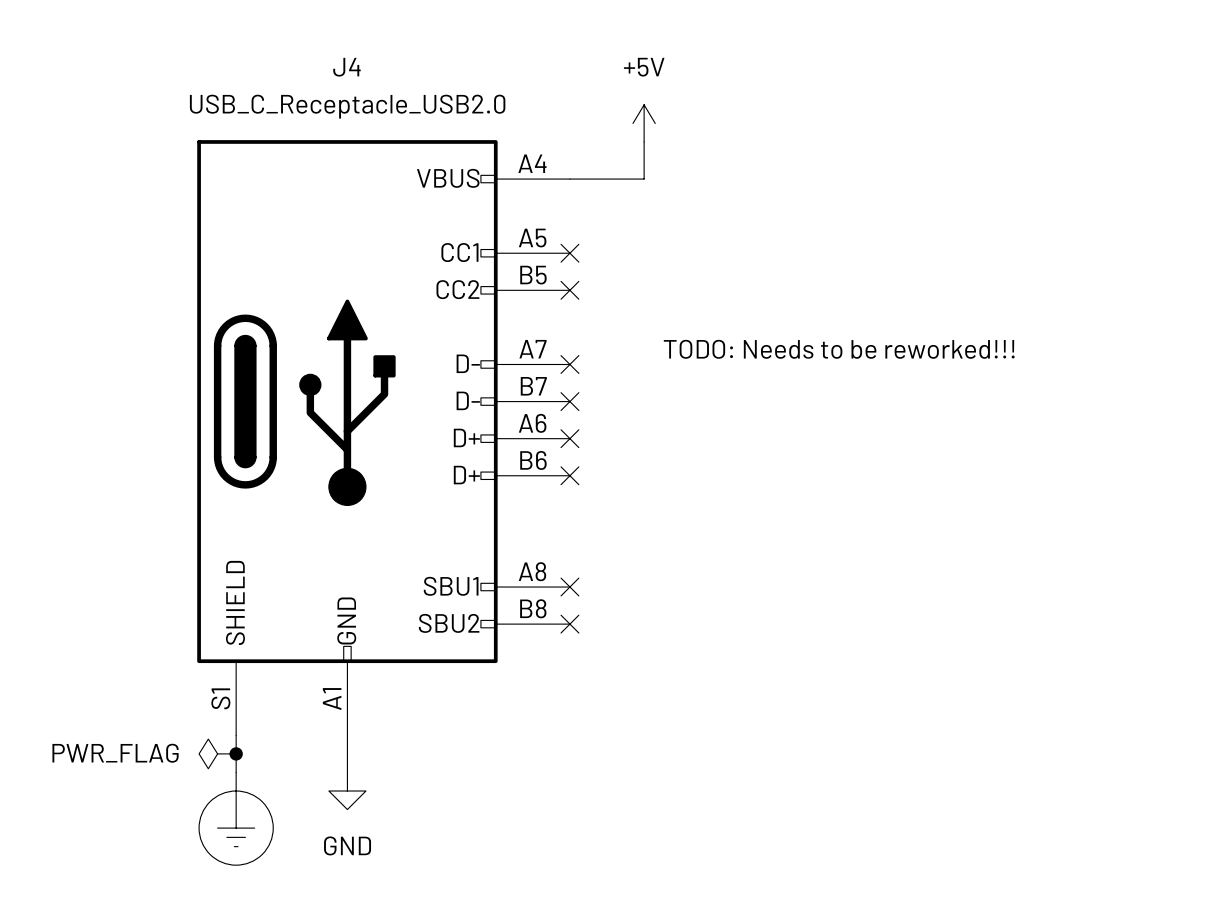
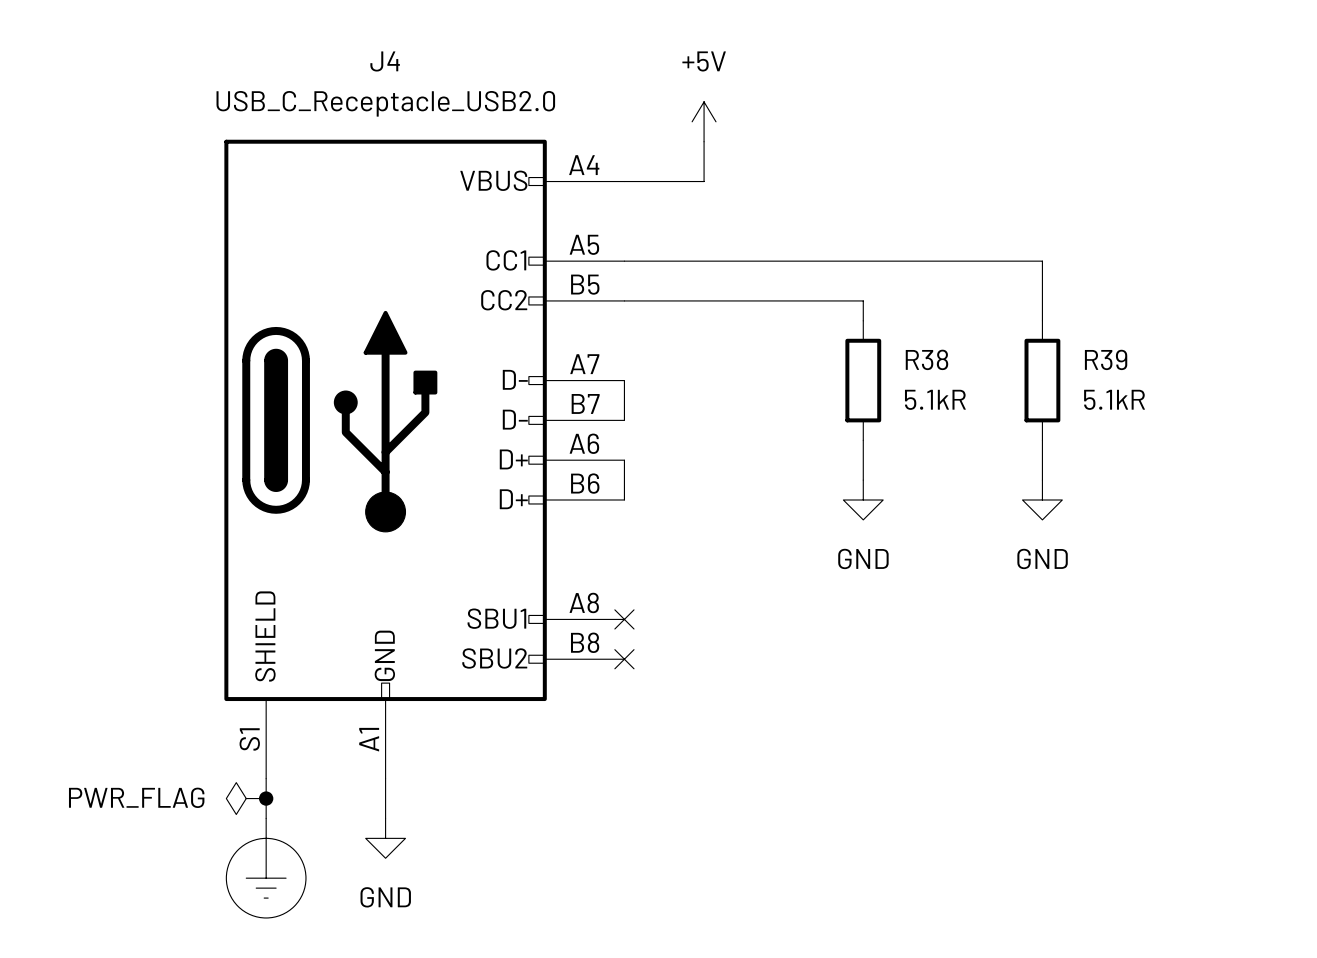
wire: none -> (624, 261) (1042, 261) (1042, 320)
no-connect mark: (569, 253) -> none
wire: none -> (624, 300) (863, 300) (863, 320)
no-connect mark: (569, 290) -> none
text: TODO: Needs to be reworked!!! (839, 349) -> none
wire: none -> (624, 380) (624, 420)
no-connect mark: (569, 364) -> none
R38: none -> 5.1kR (863, 380)
R39: none -> 5.1kR (1042, 380)
no-connect mark: (569, 401) -> none
wire: none -> (863, 440) (863, 480)
wire: none -> (1042, 440) (1042, 480)
wire: none -> (624, 460) (624, 500)
no-connect mark: (569, 438) -> none
no-connect mark: (569, 475) -> none
power symbol: none -> GND (863, 500)
power symbol: none -> GND (1042, 500)

